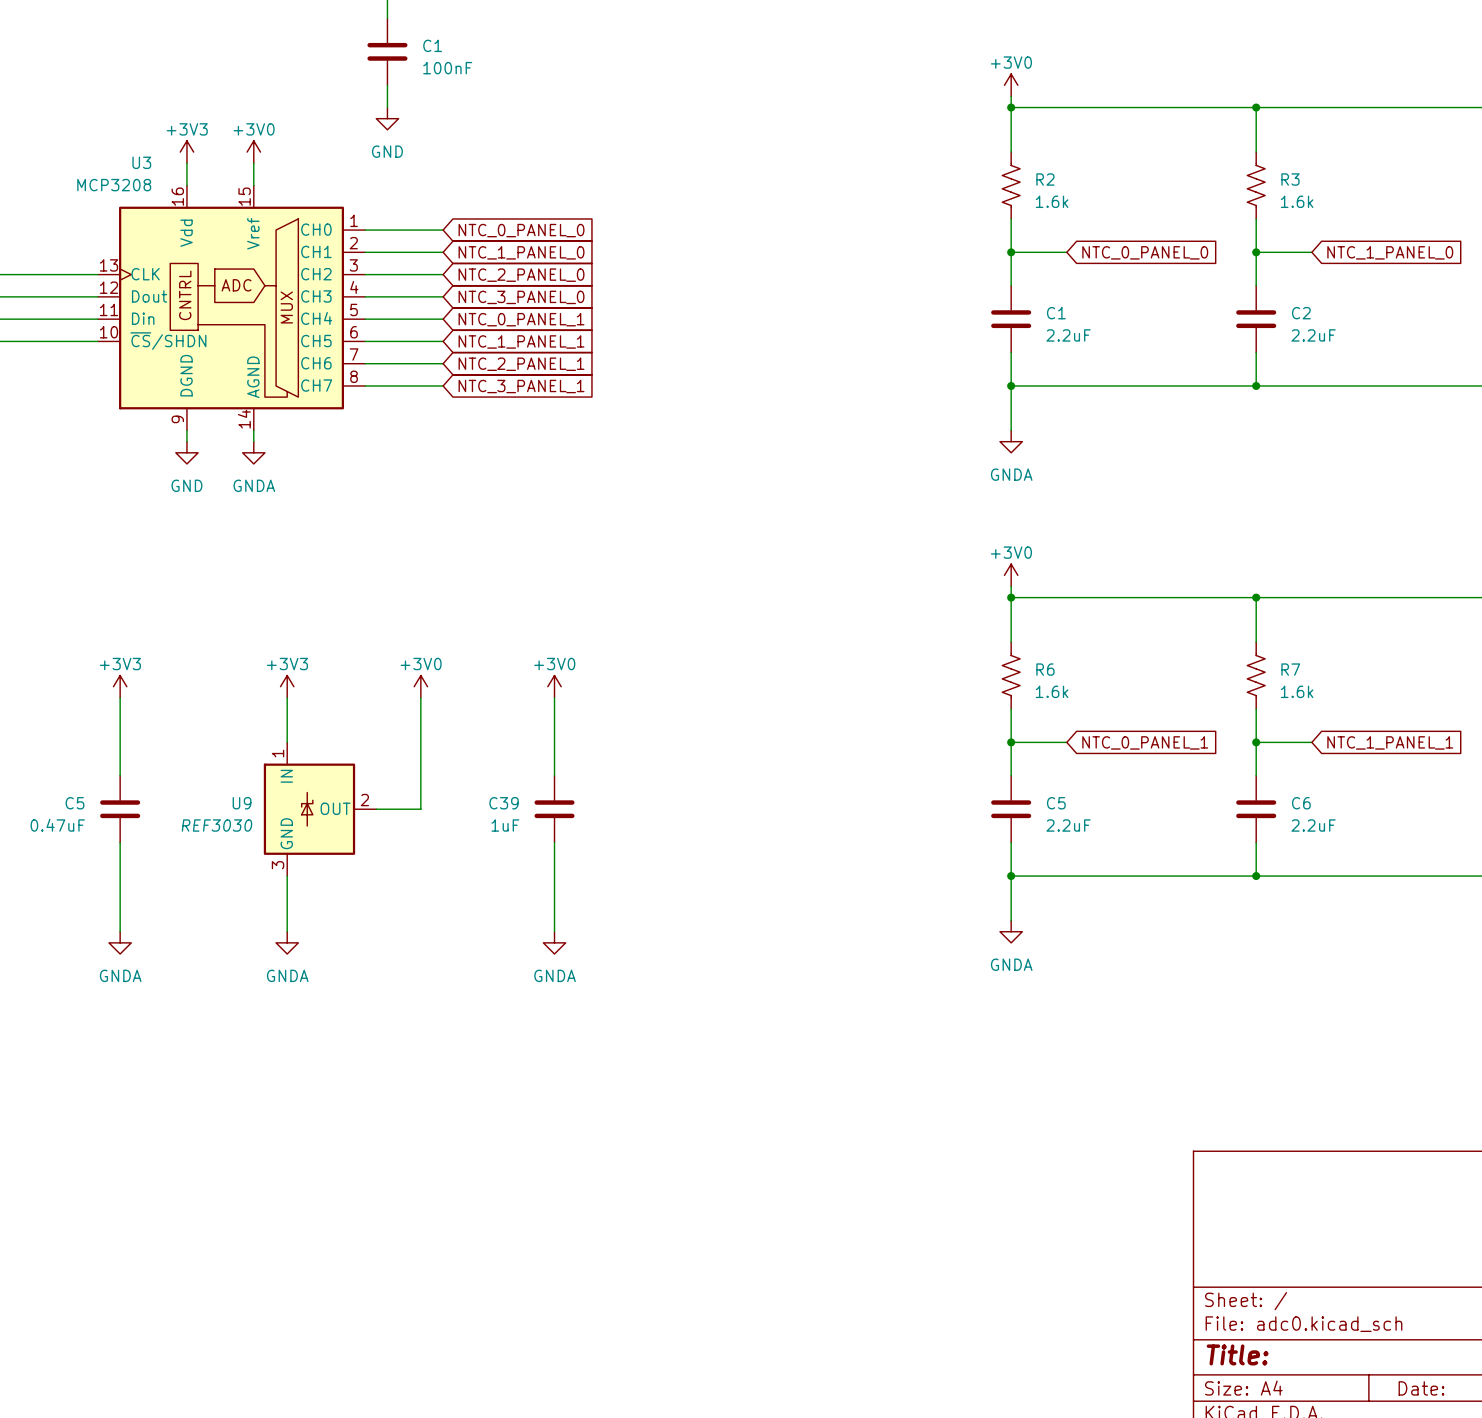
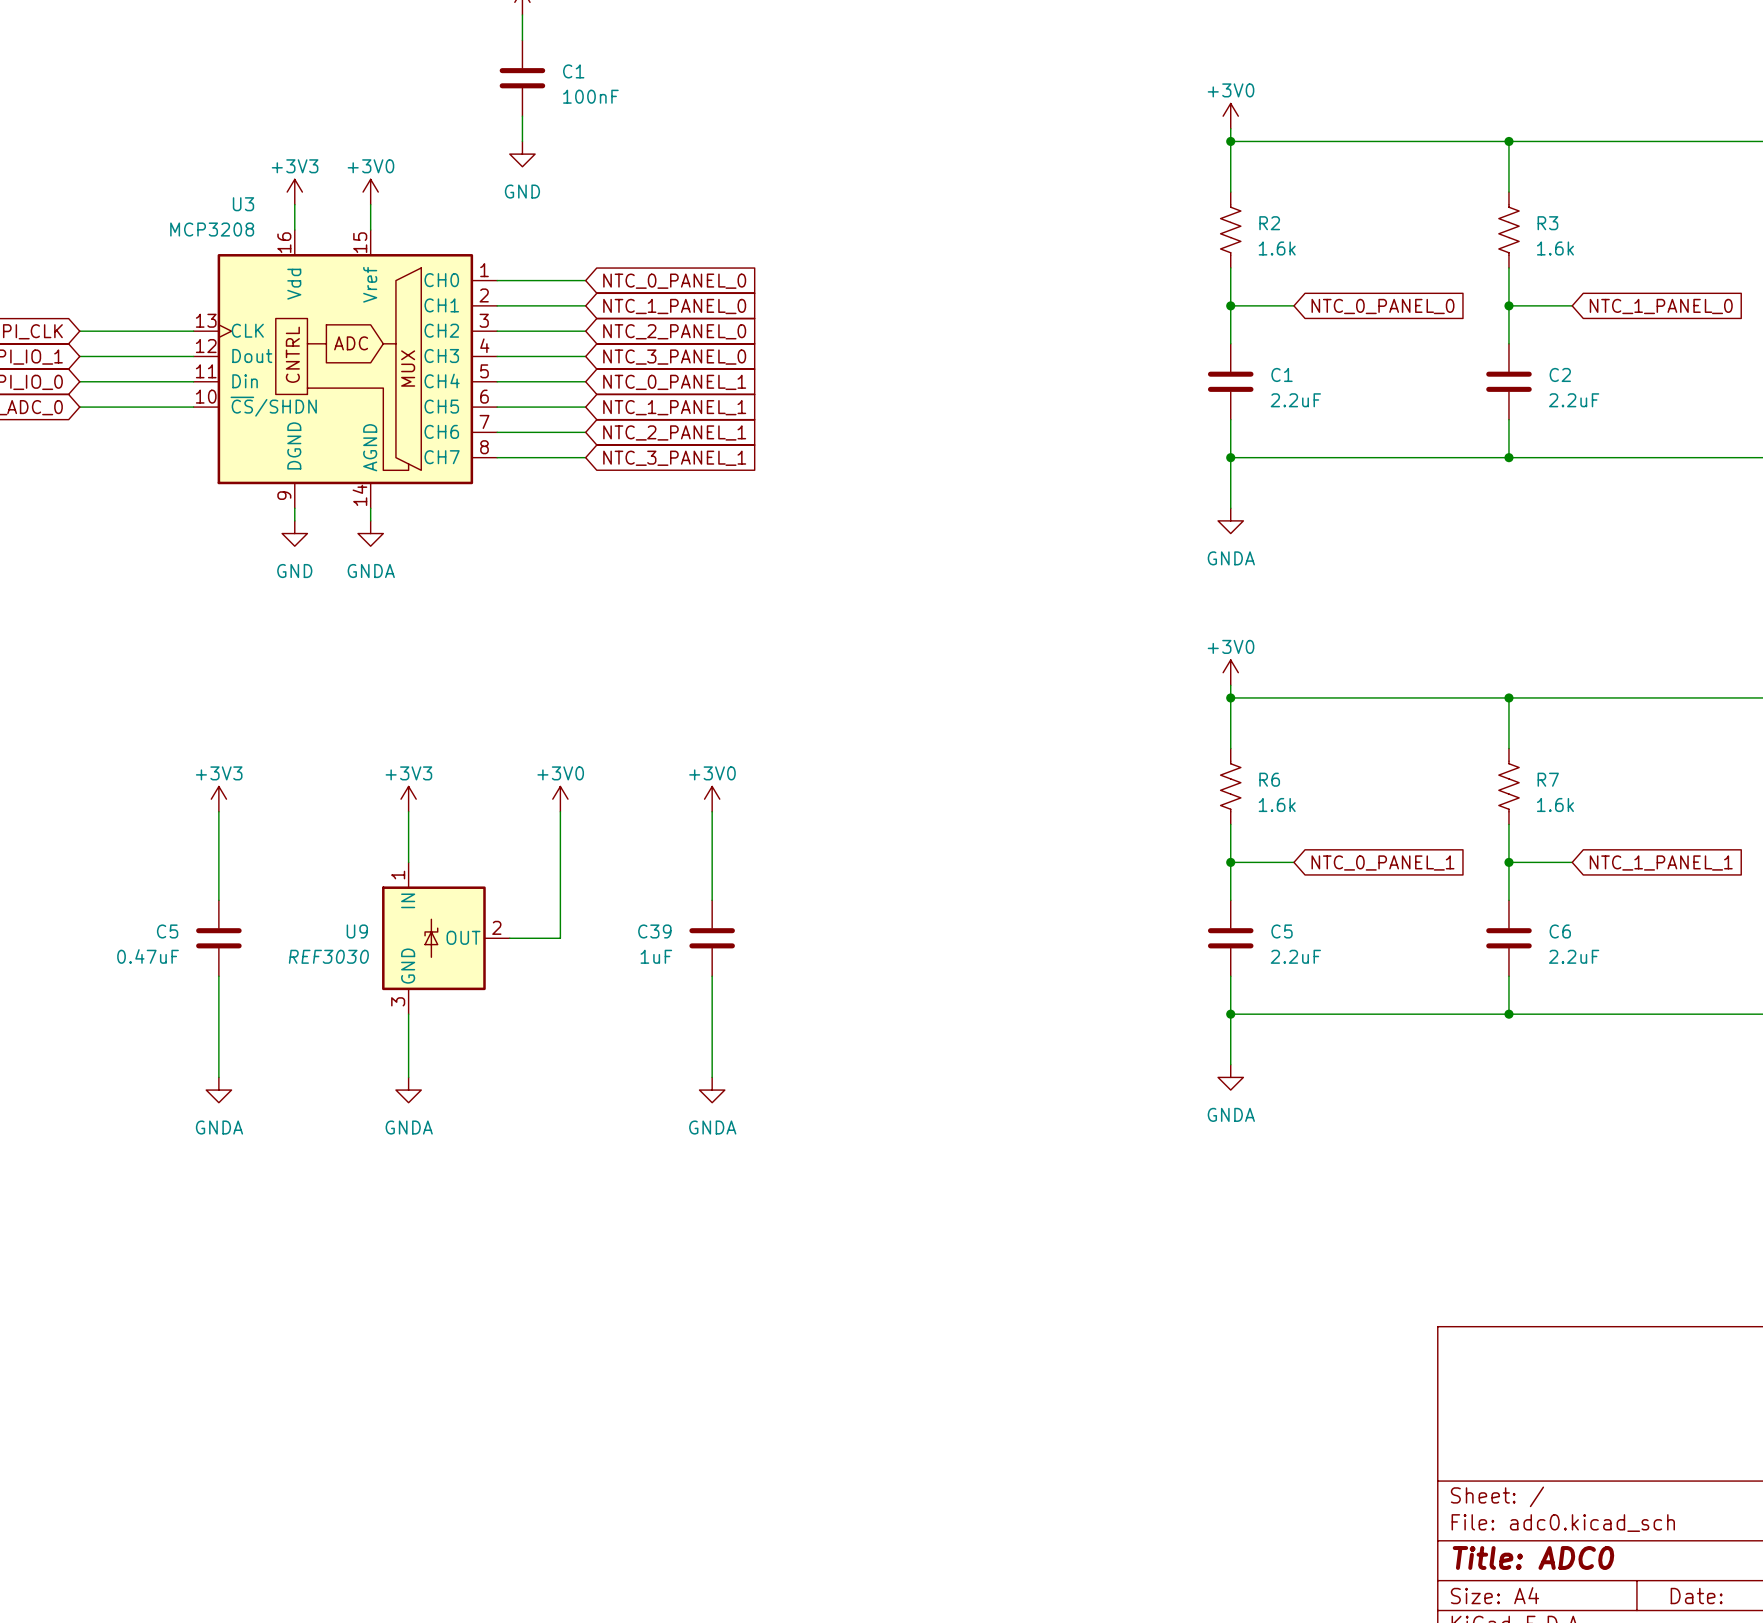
title block: Title: (1237, 1354) -> Title: ADC0 (1533, 1557)

